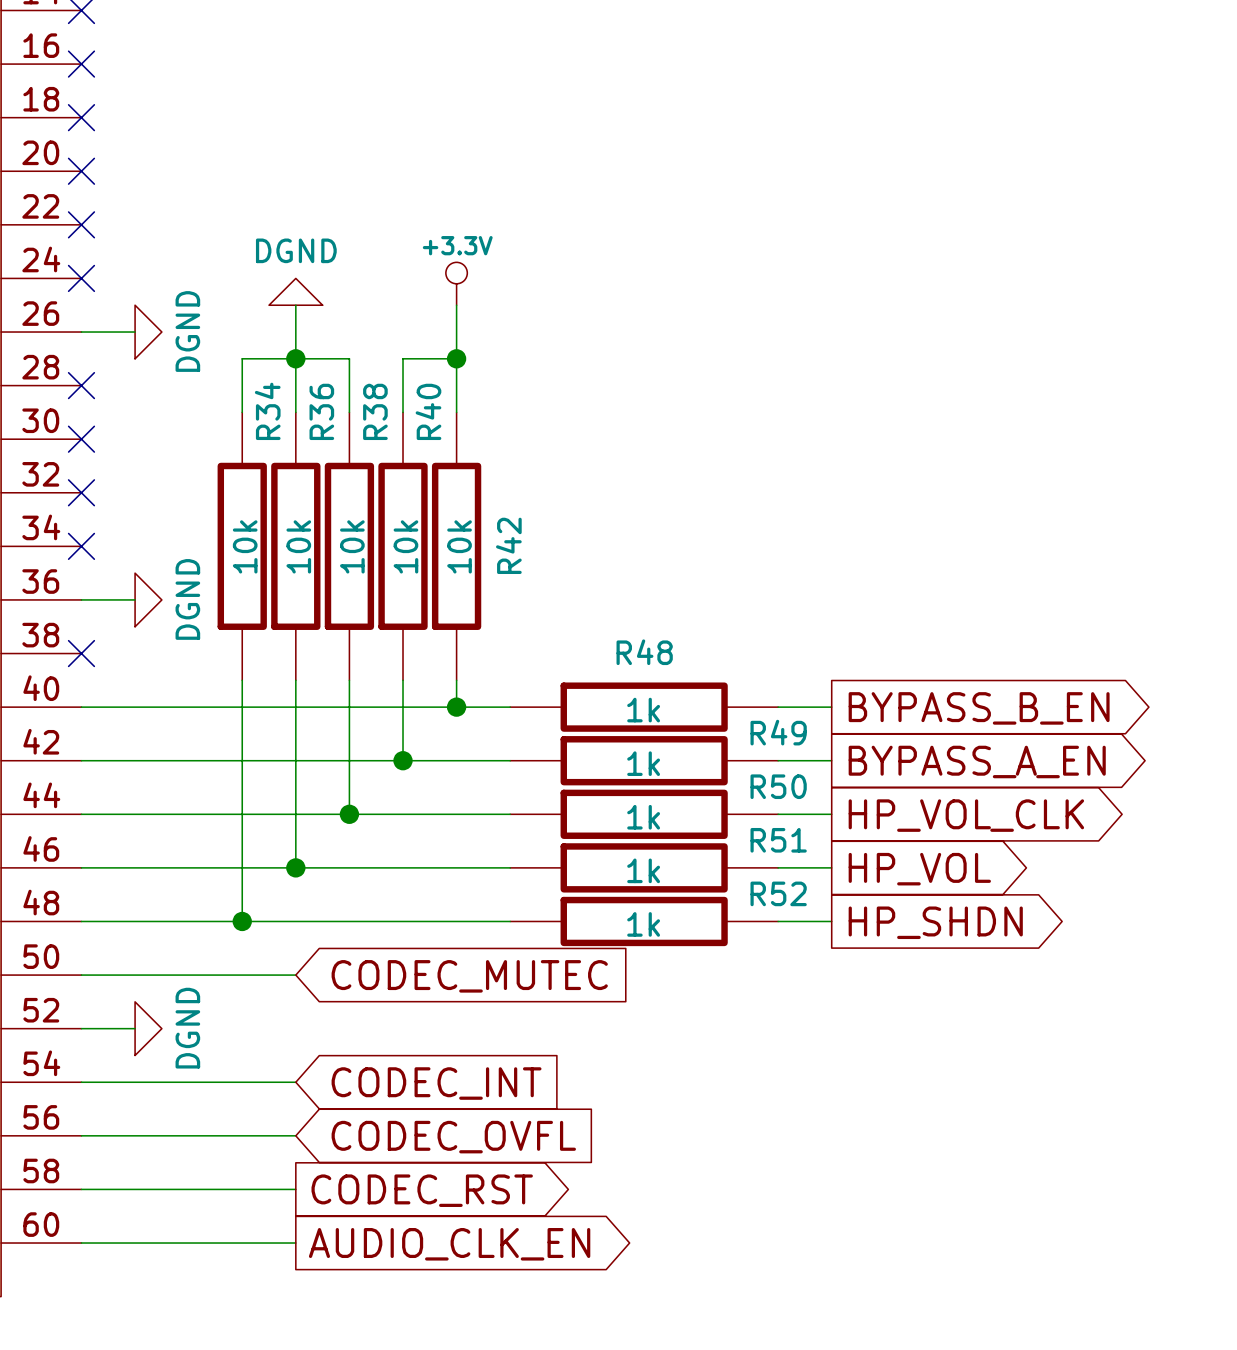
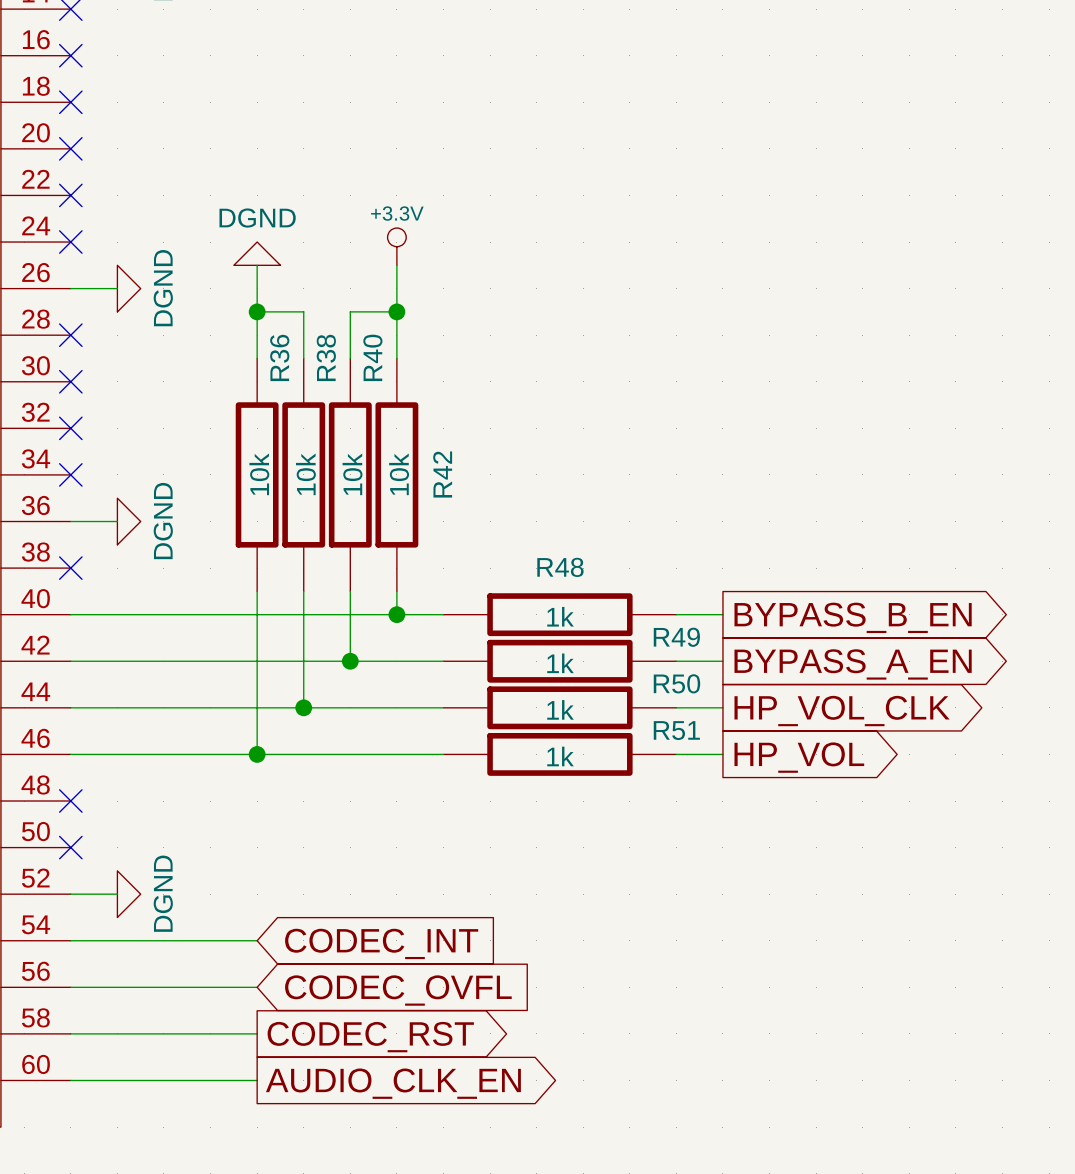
wire: (295, 358) (242, 358) (242, 412) -> none
R34: 10k (242, 546) -> none
wire: (242, 680) (242, 921) -> none
wire: (81, 921) (510, 921) -> none
no-connect mark: none -> (70, 801)
junction: (242, 921) -> none
R52: 1k (644, 921) -> none
wire: (778, 921) (831, 921) -> none
global label: HP_SHDN (935, 922) -> none
wire: (81, 975) (295, 975) -> none
no-connect mark: none -> (70, 847)
global label: CODEC_MUTEC (469, 976) -> none

